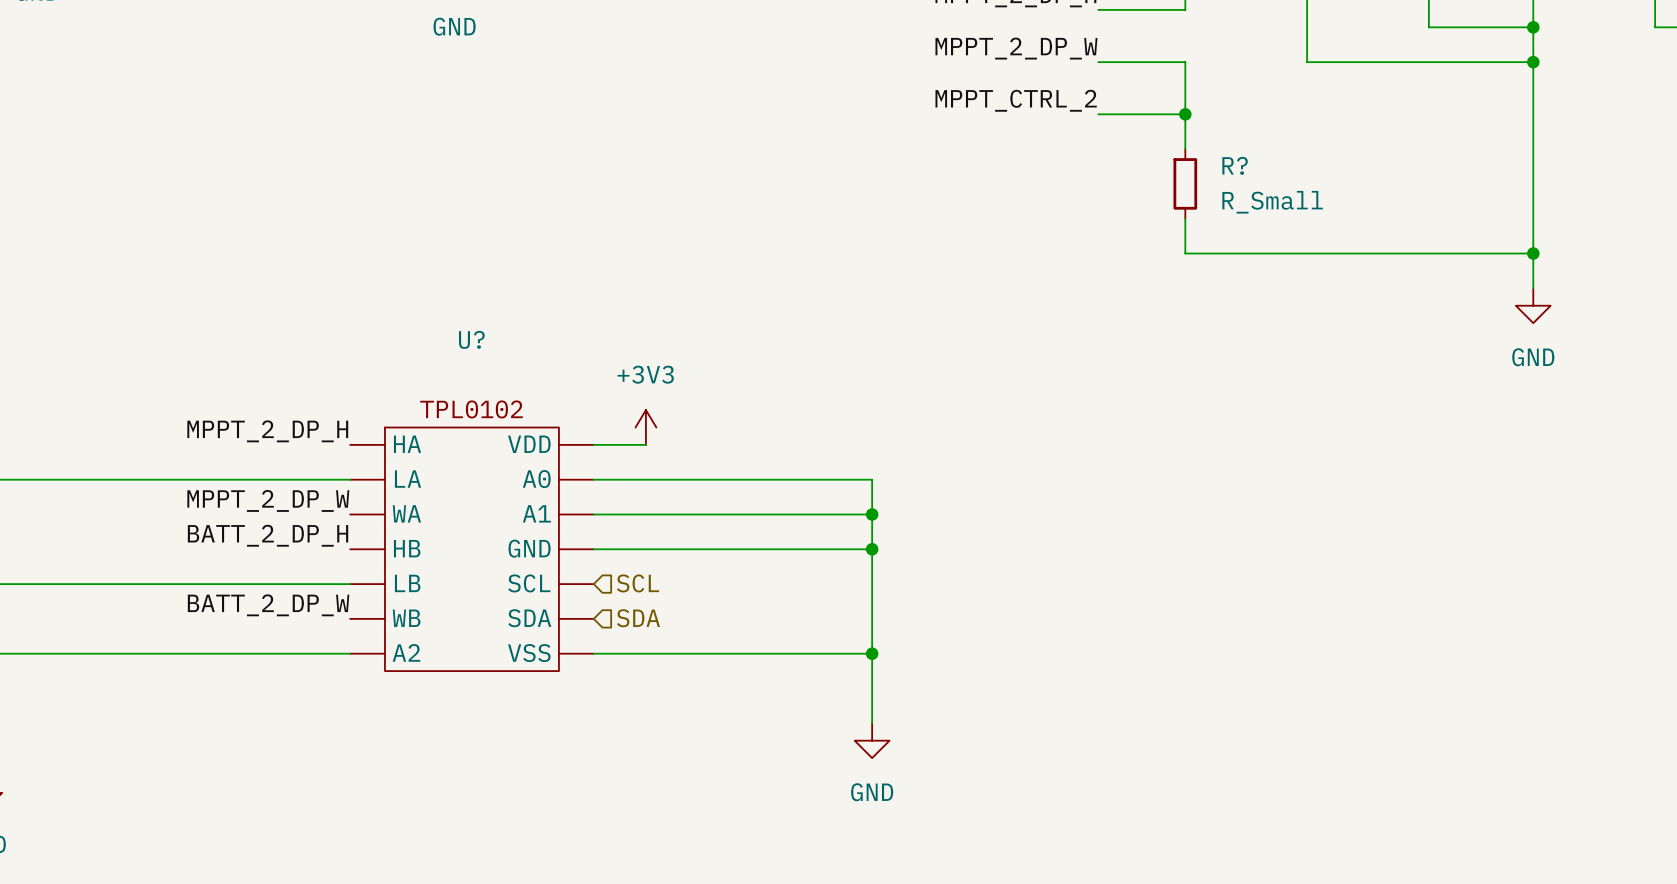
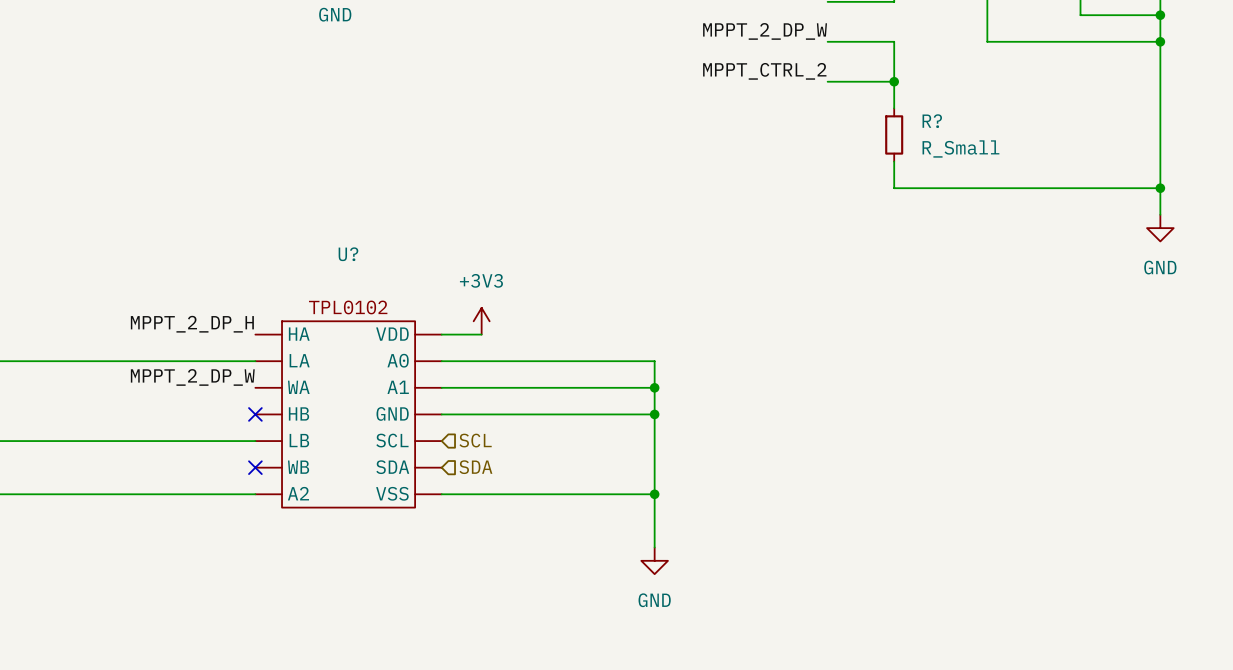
label: BATT_2_DP_H (268, 535) -> none
no-connect mark: none -> (255, 414)
label: BATT_2_DP_W (268, 605) -> none
no-connect mark: none -> (255, 467)

